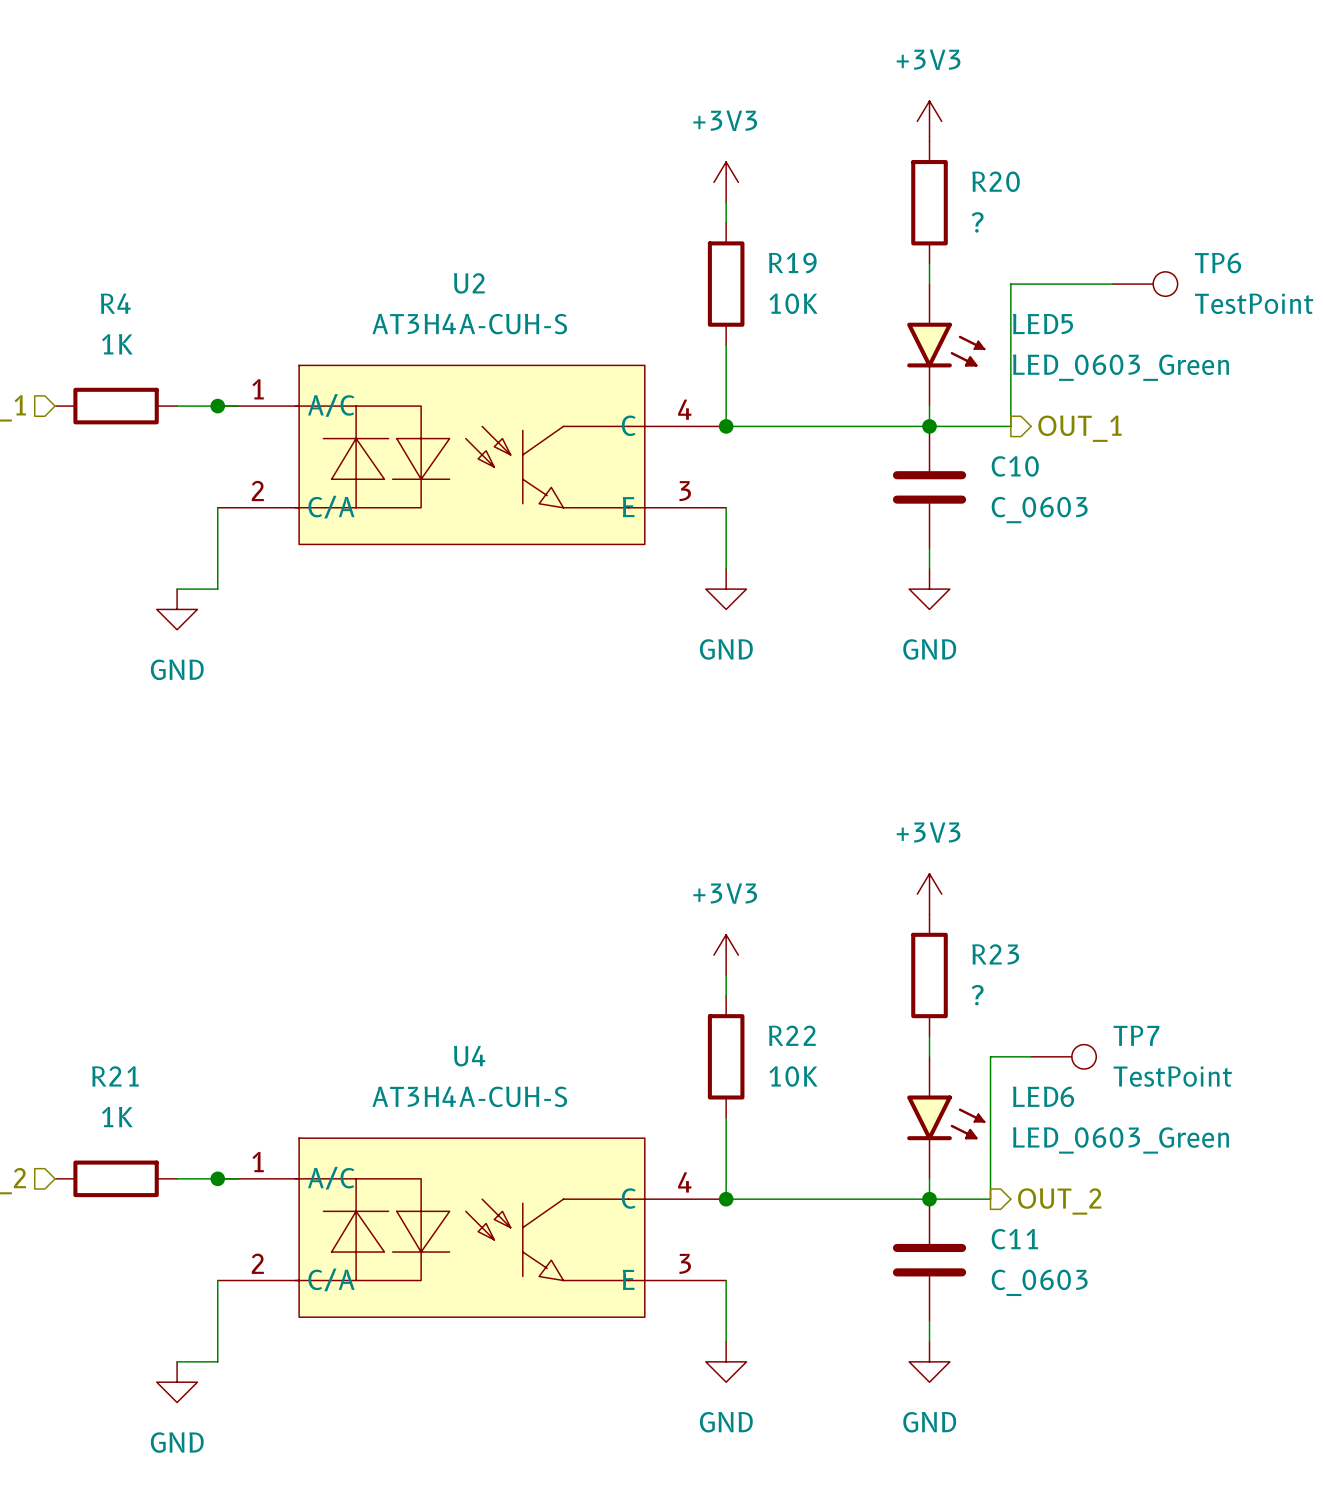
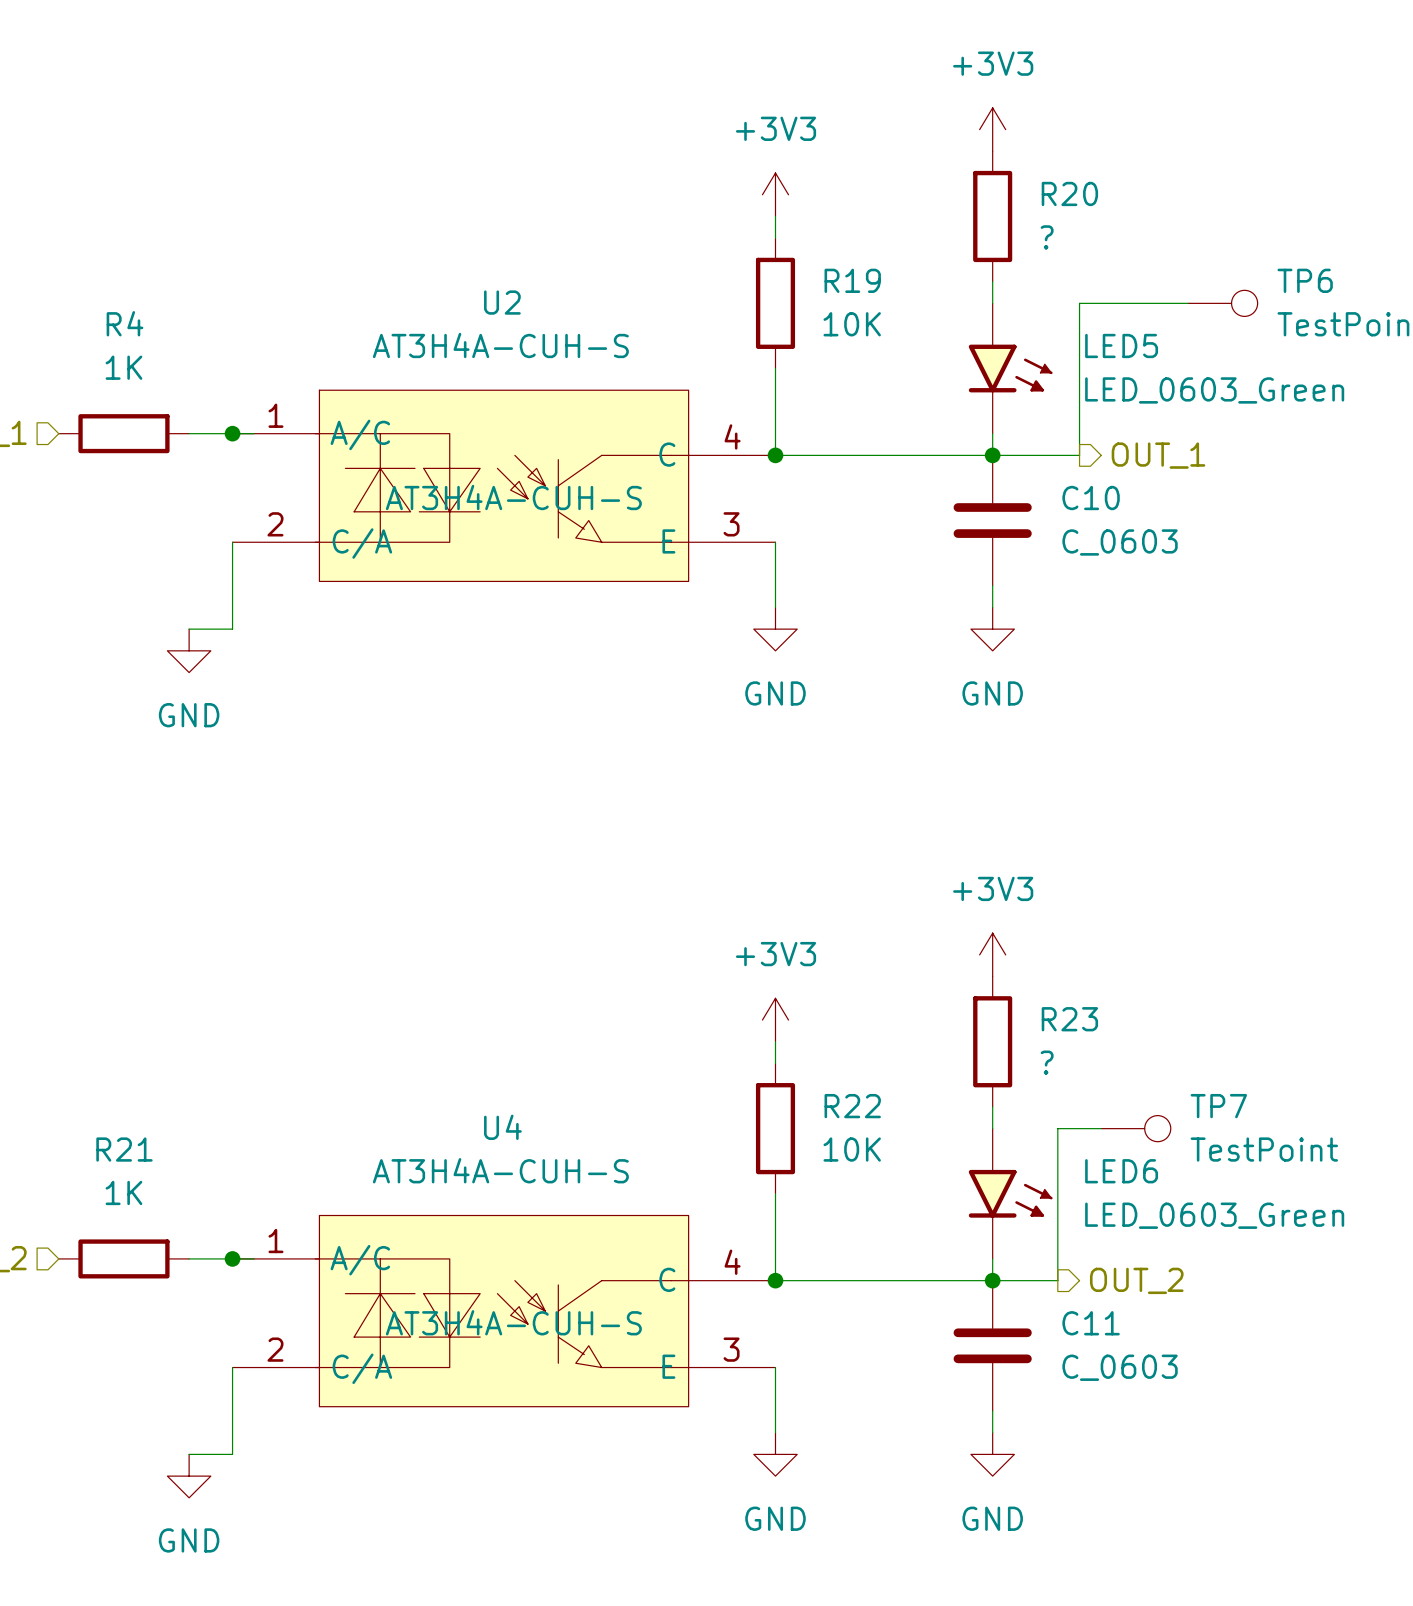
U2 text: none -> AT3H4A-CUH-S (513, 497)
U4 text: none -> AT3H4A-CUH-S (513, 1322)

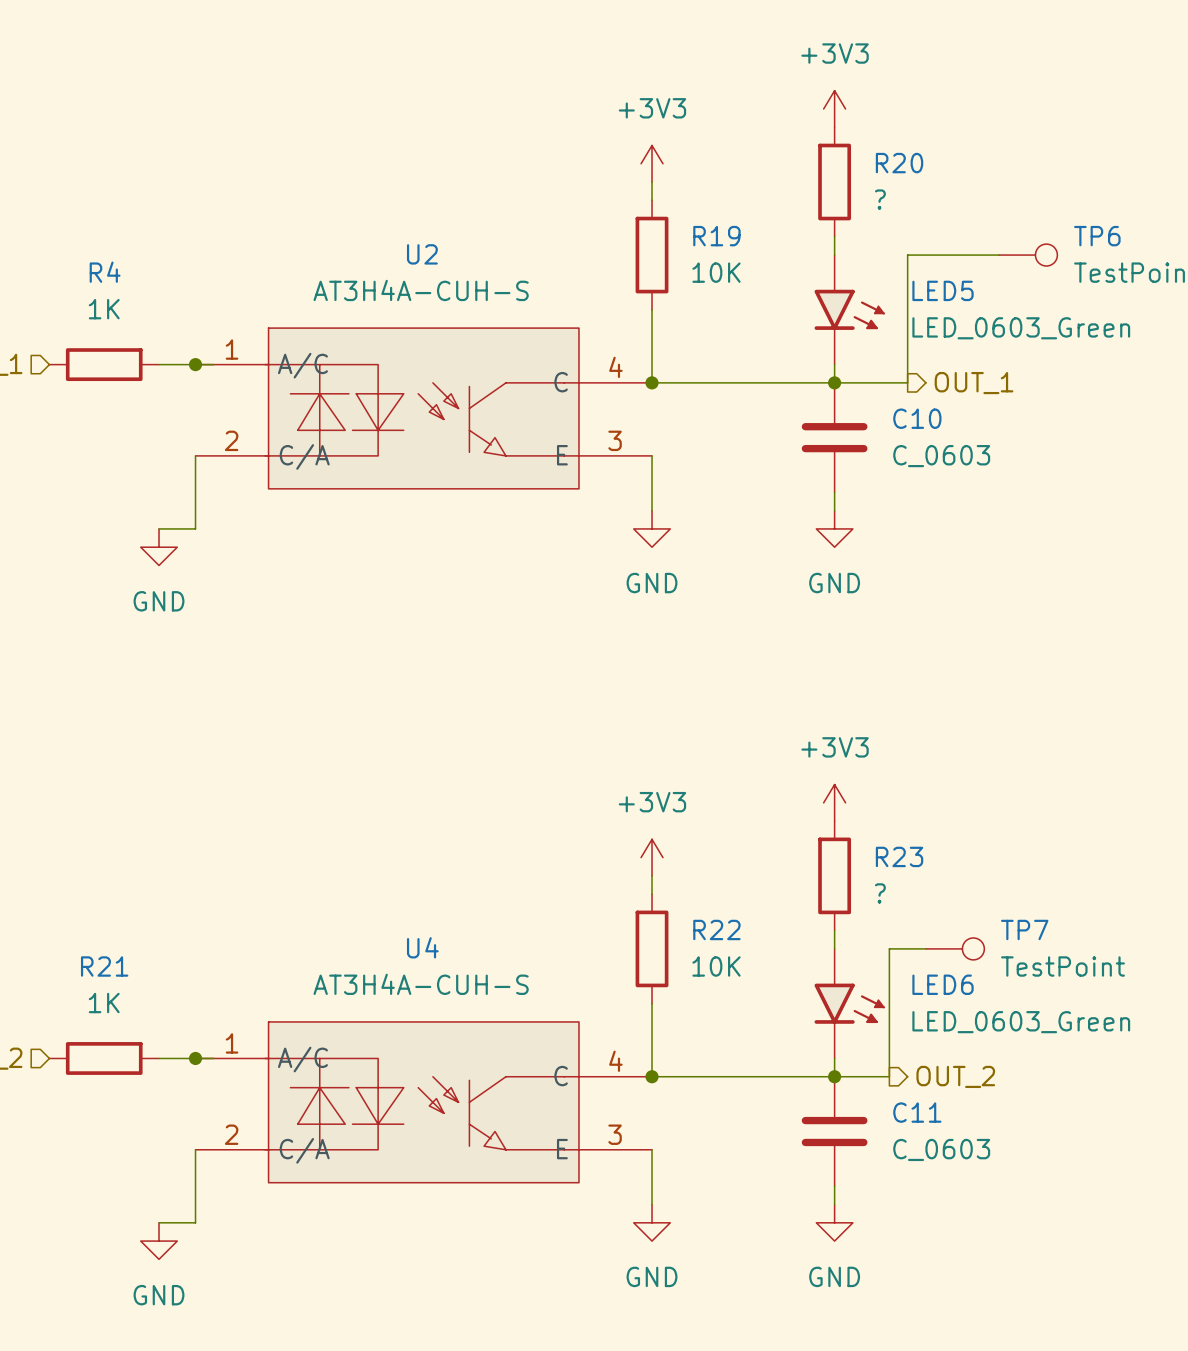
U2 text: AT3H4A-CUH-S (513, 497) -> none
U4 text: AT3H4A-CUH-S (513, 1322) -> none

